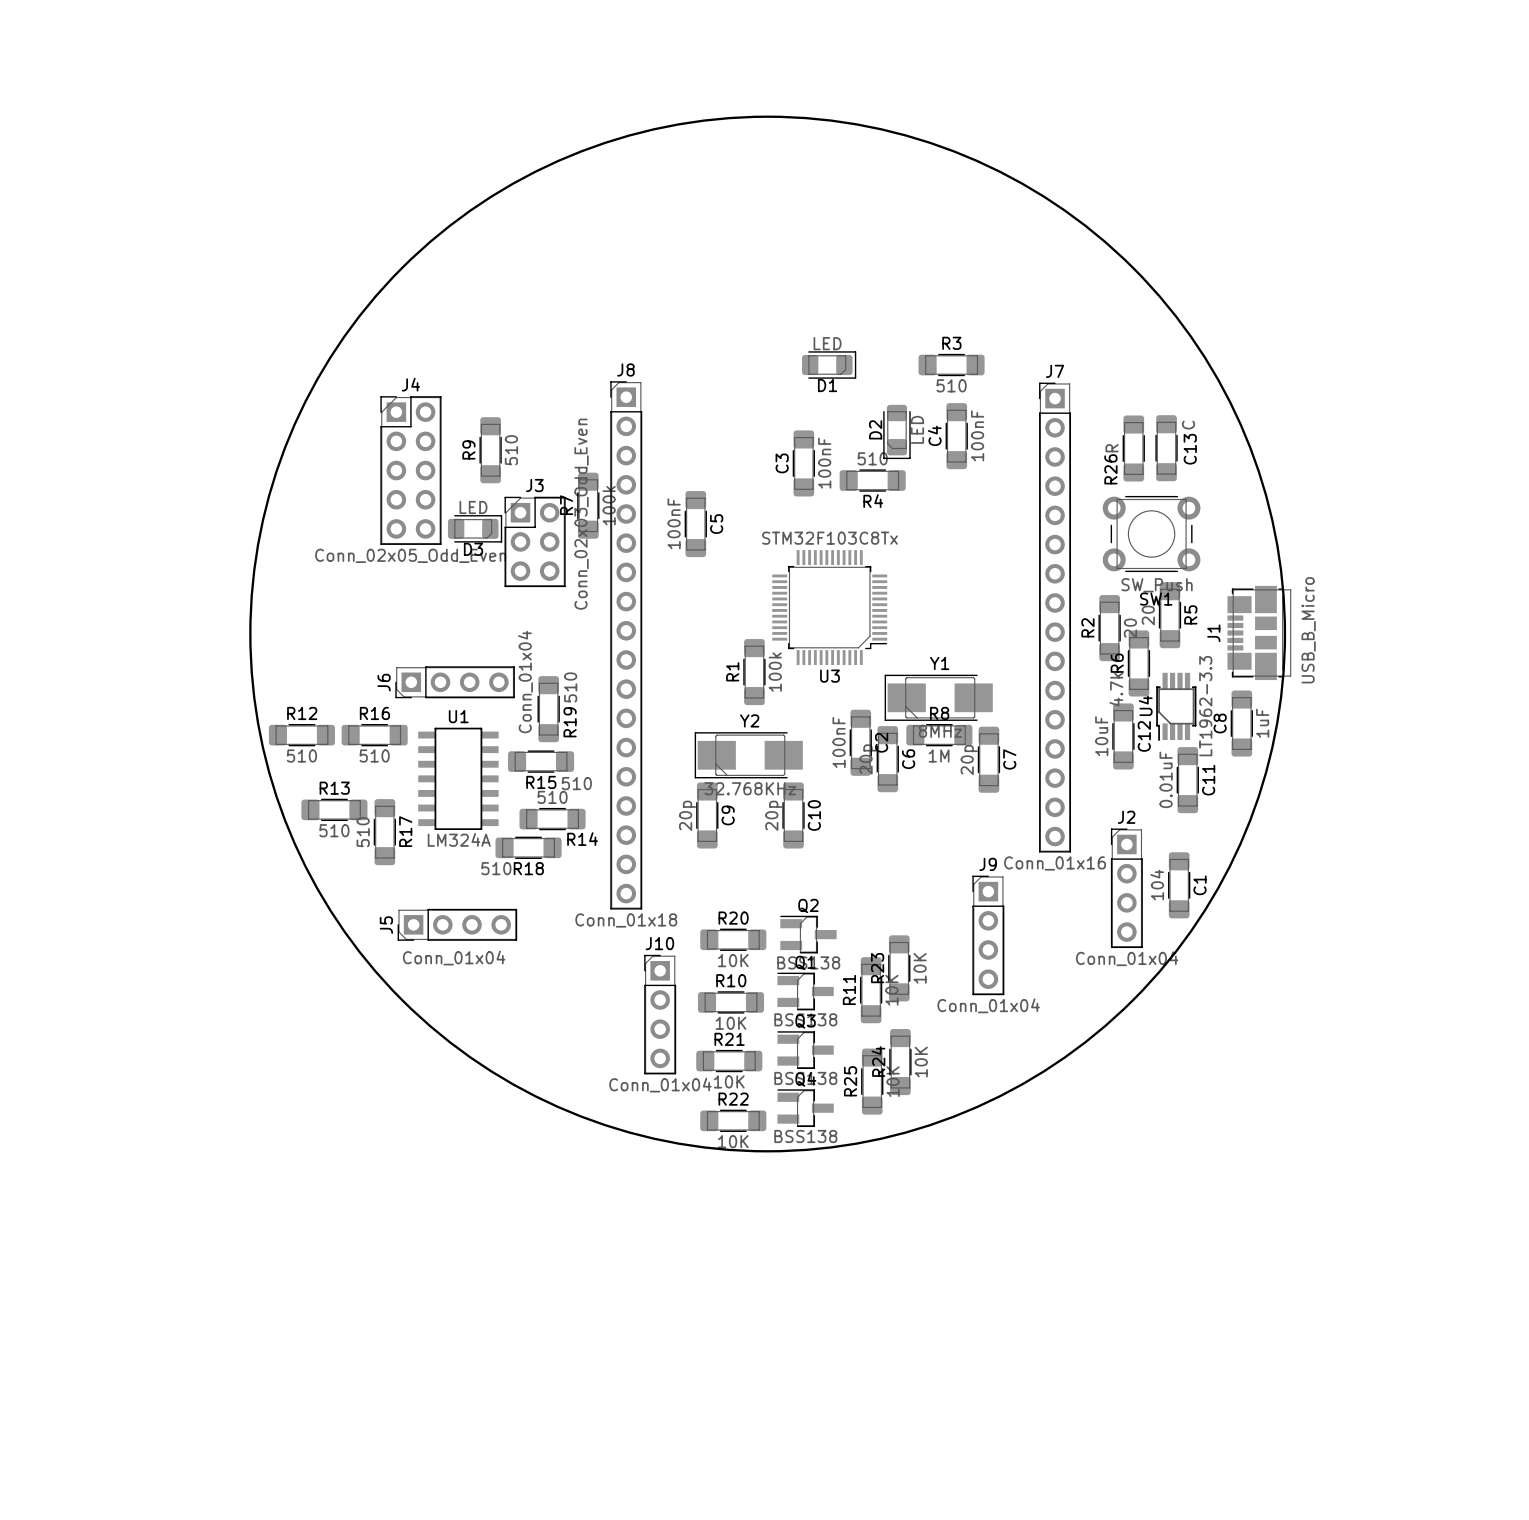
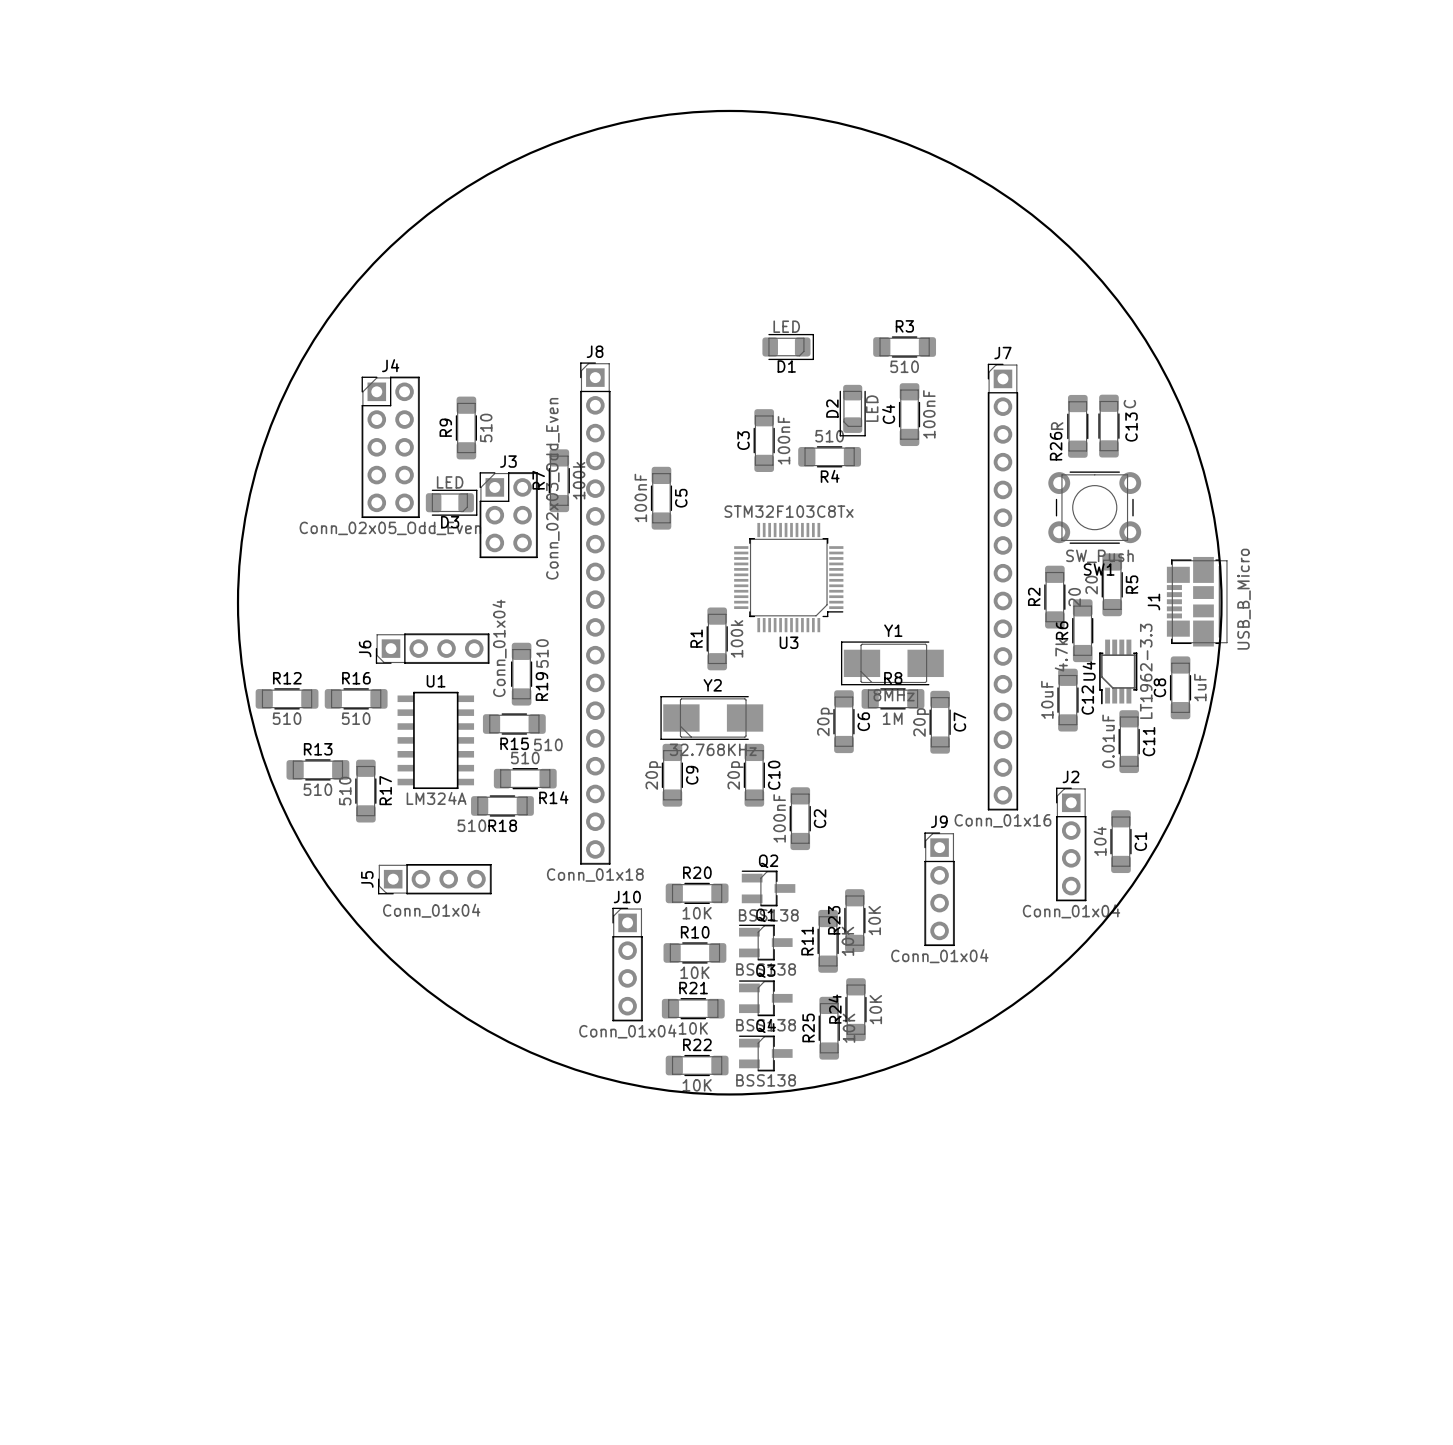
C2 position: (860, 742) -> (800, 818)

